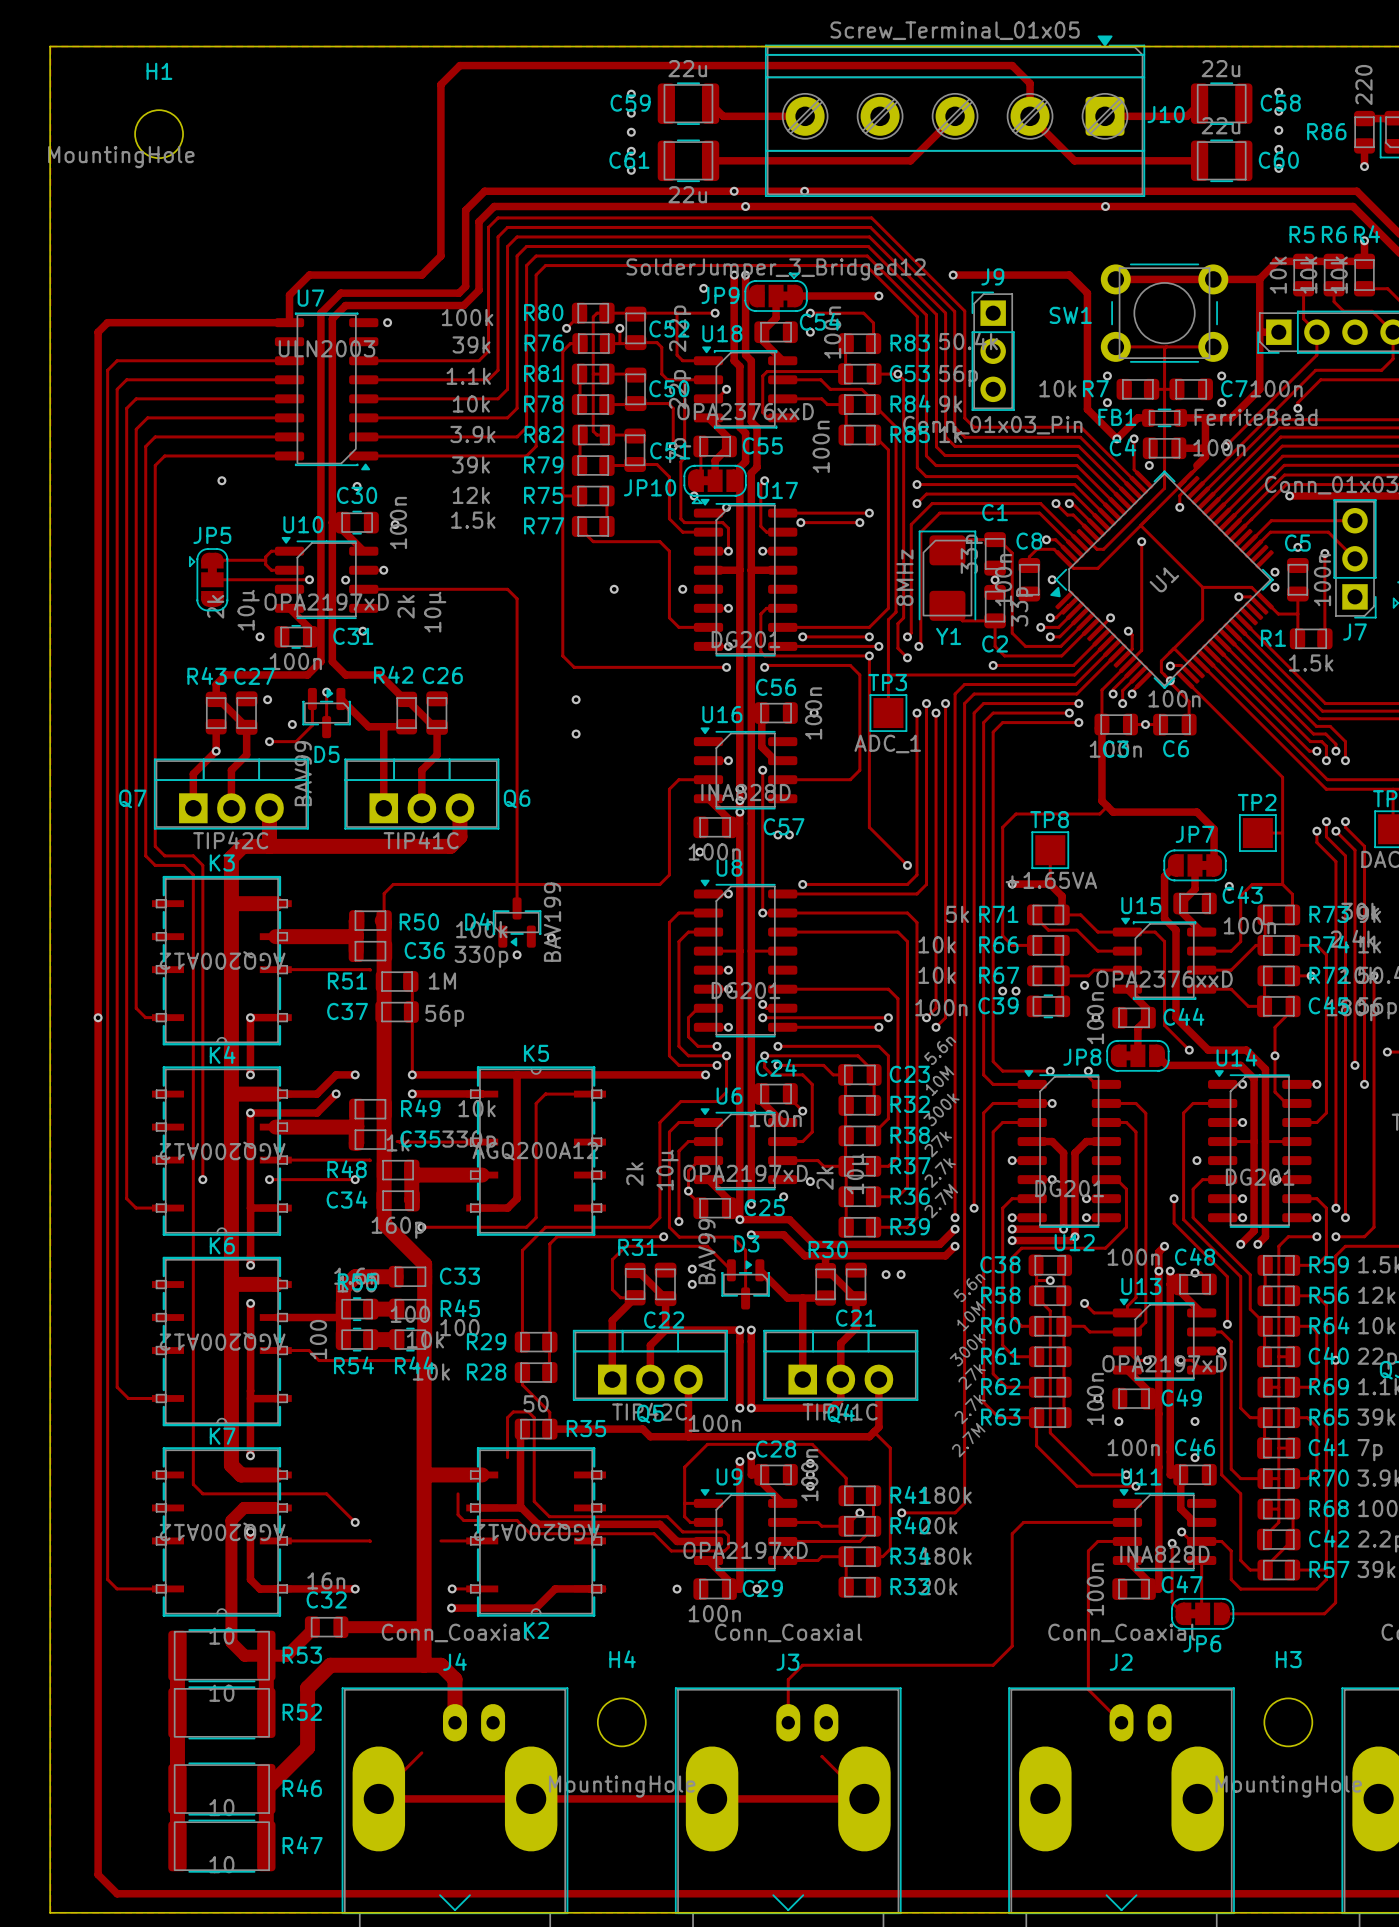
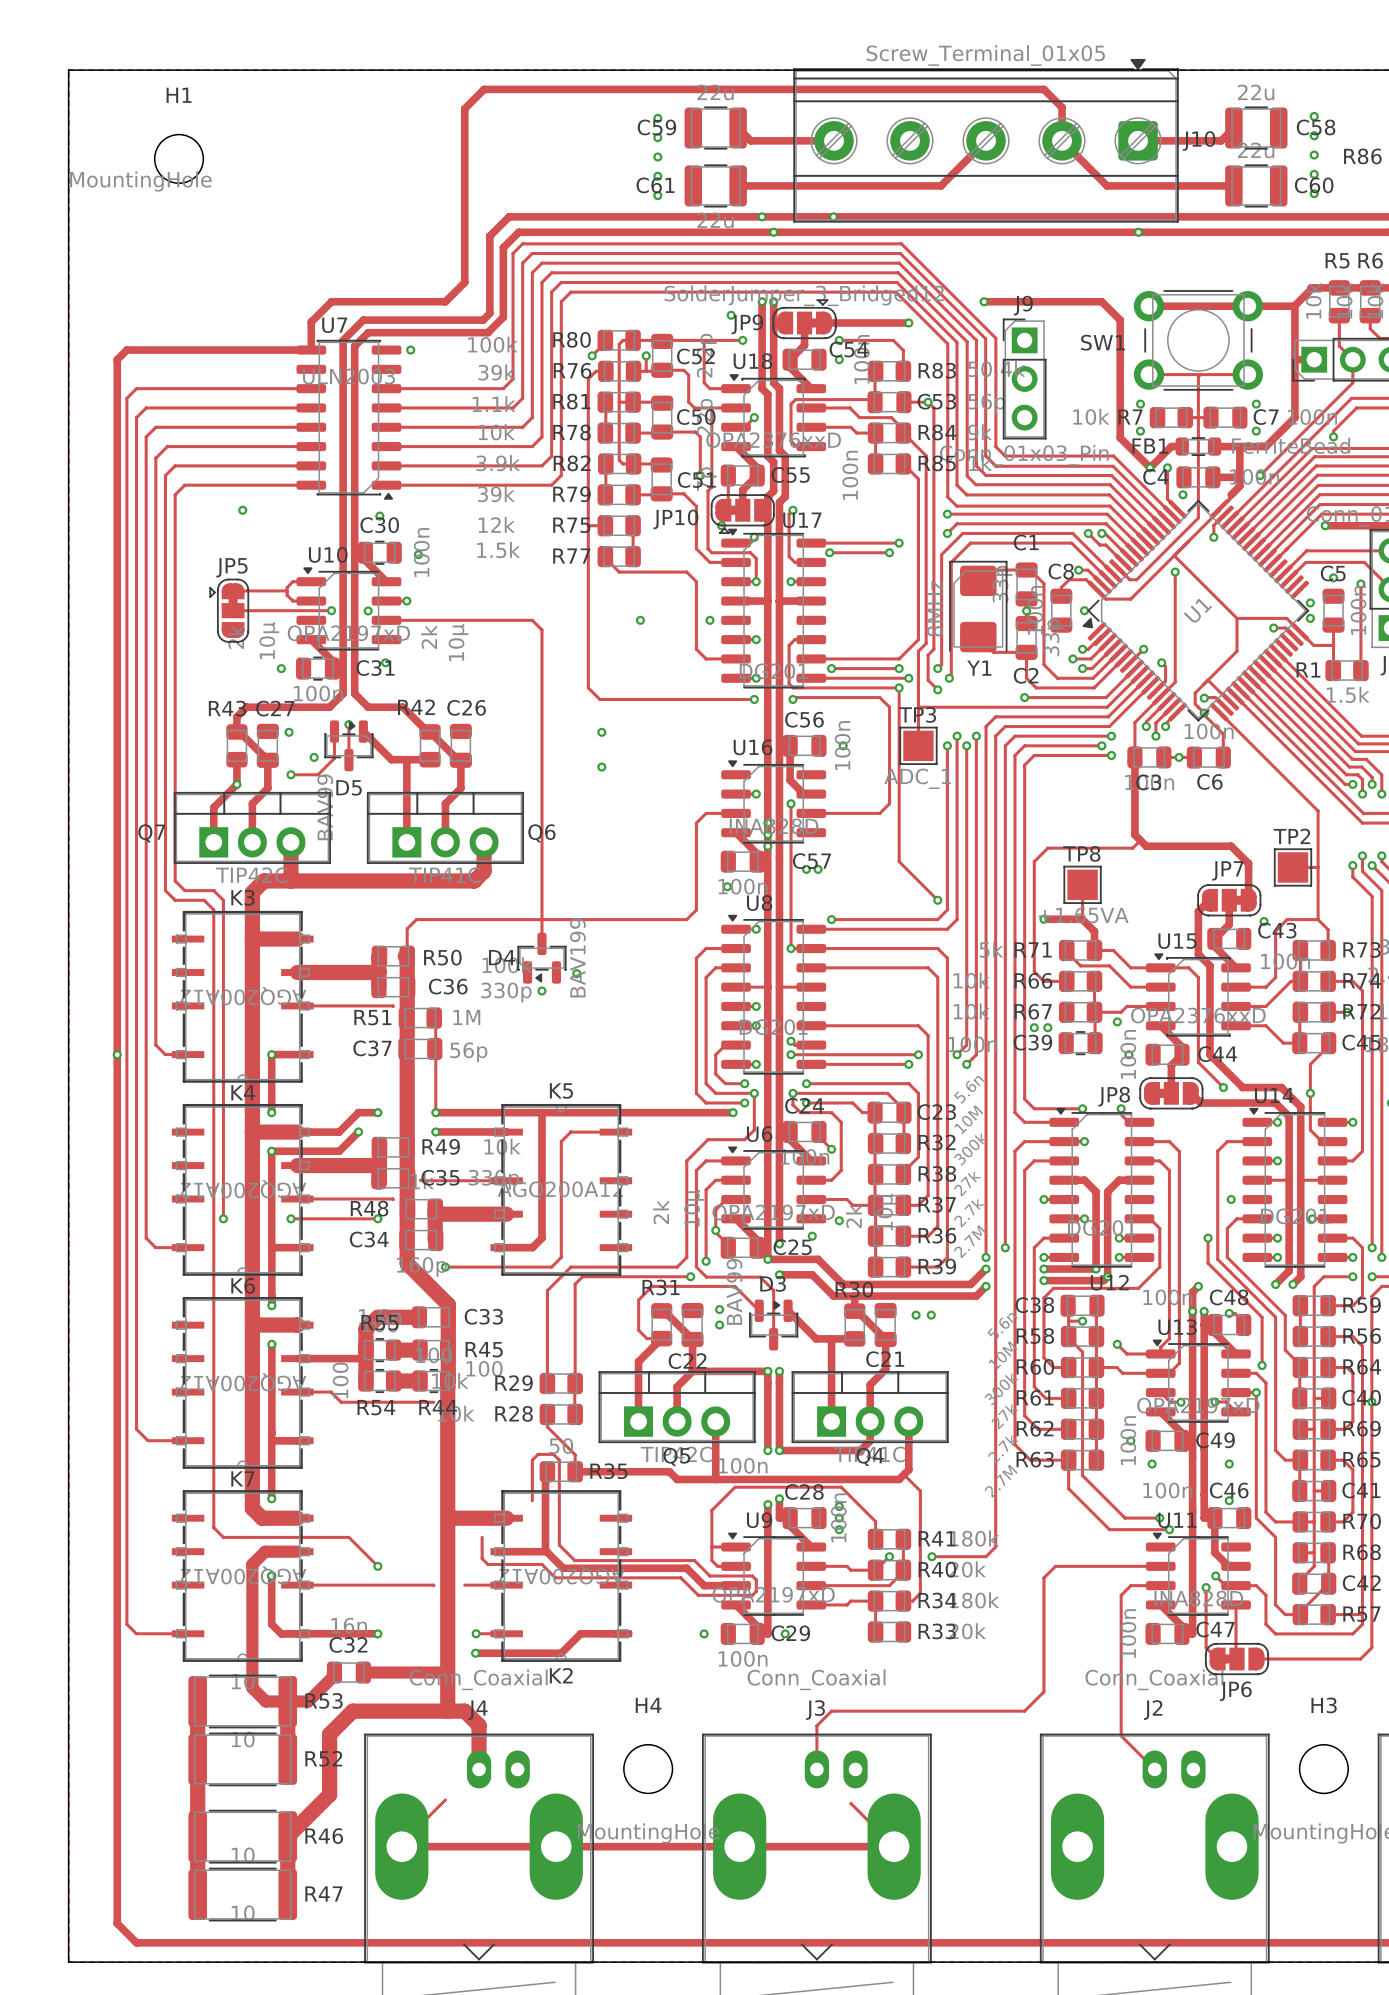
track: (369, 1540) (370, 1541) -> (392, 1585) (433, 1585)

